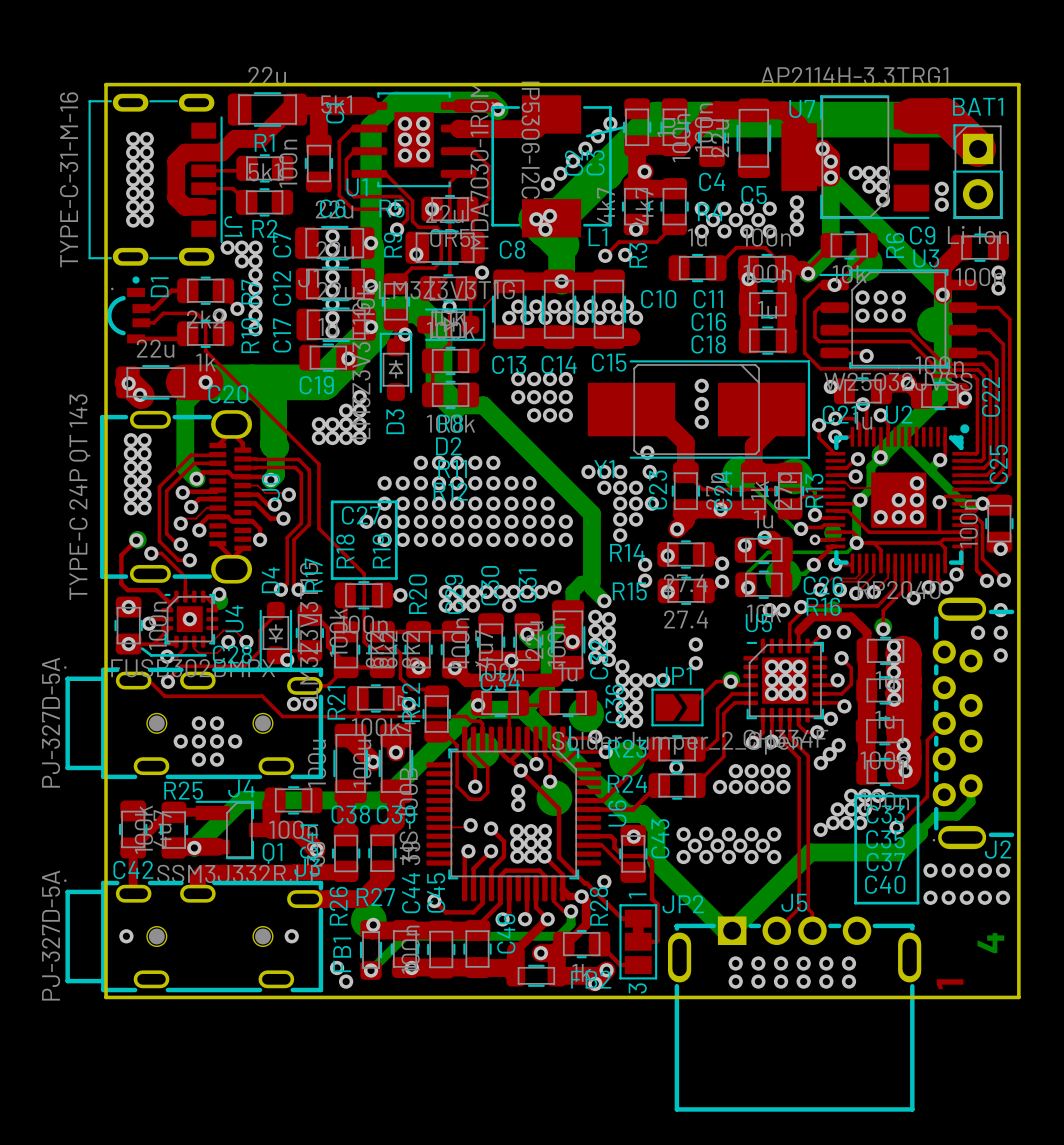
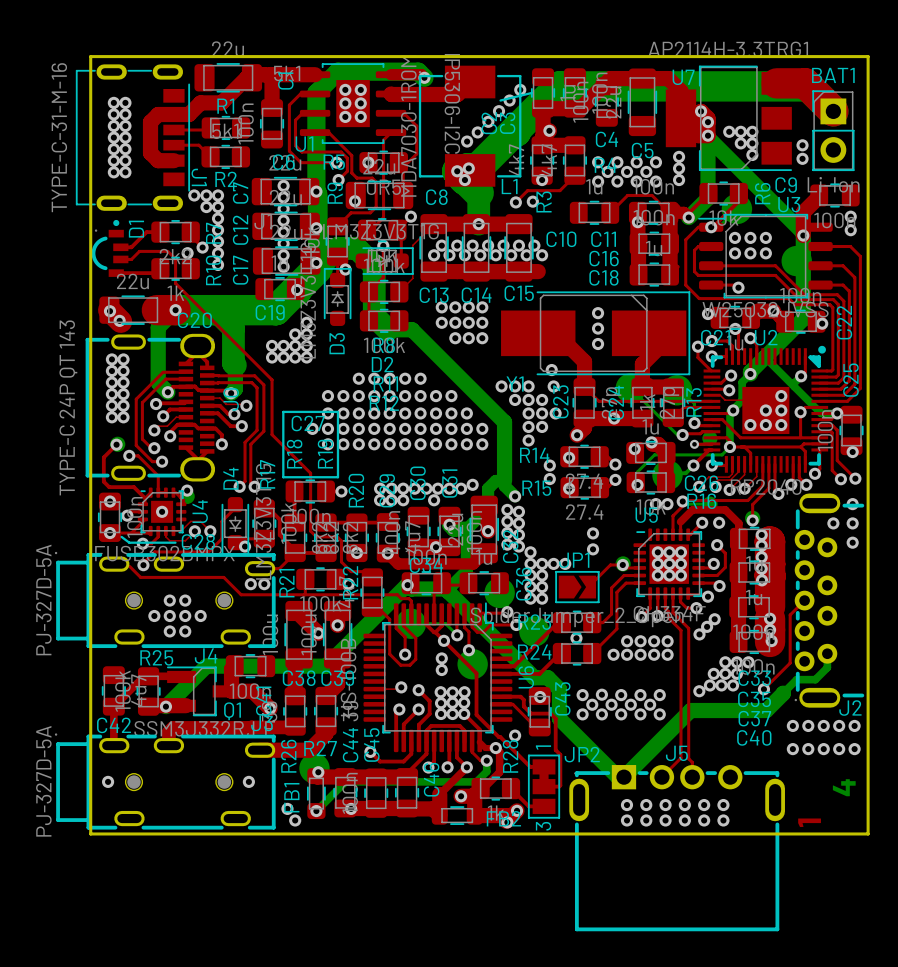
line: (855, 796) (918, 796) (918, 903) (855, 903) (855, 796) -> none

